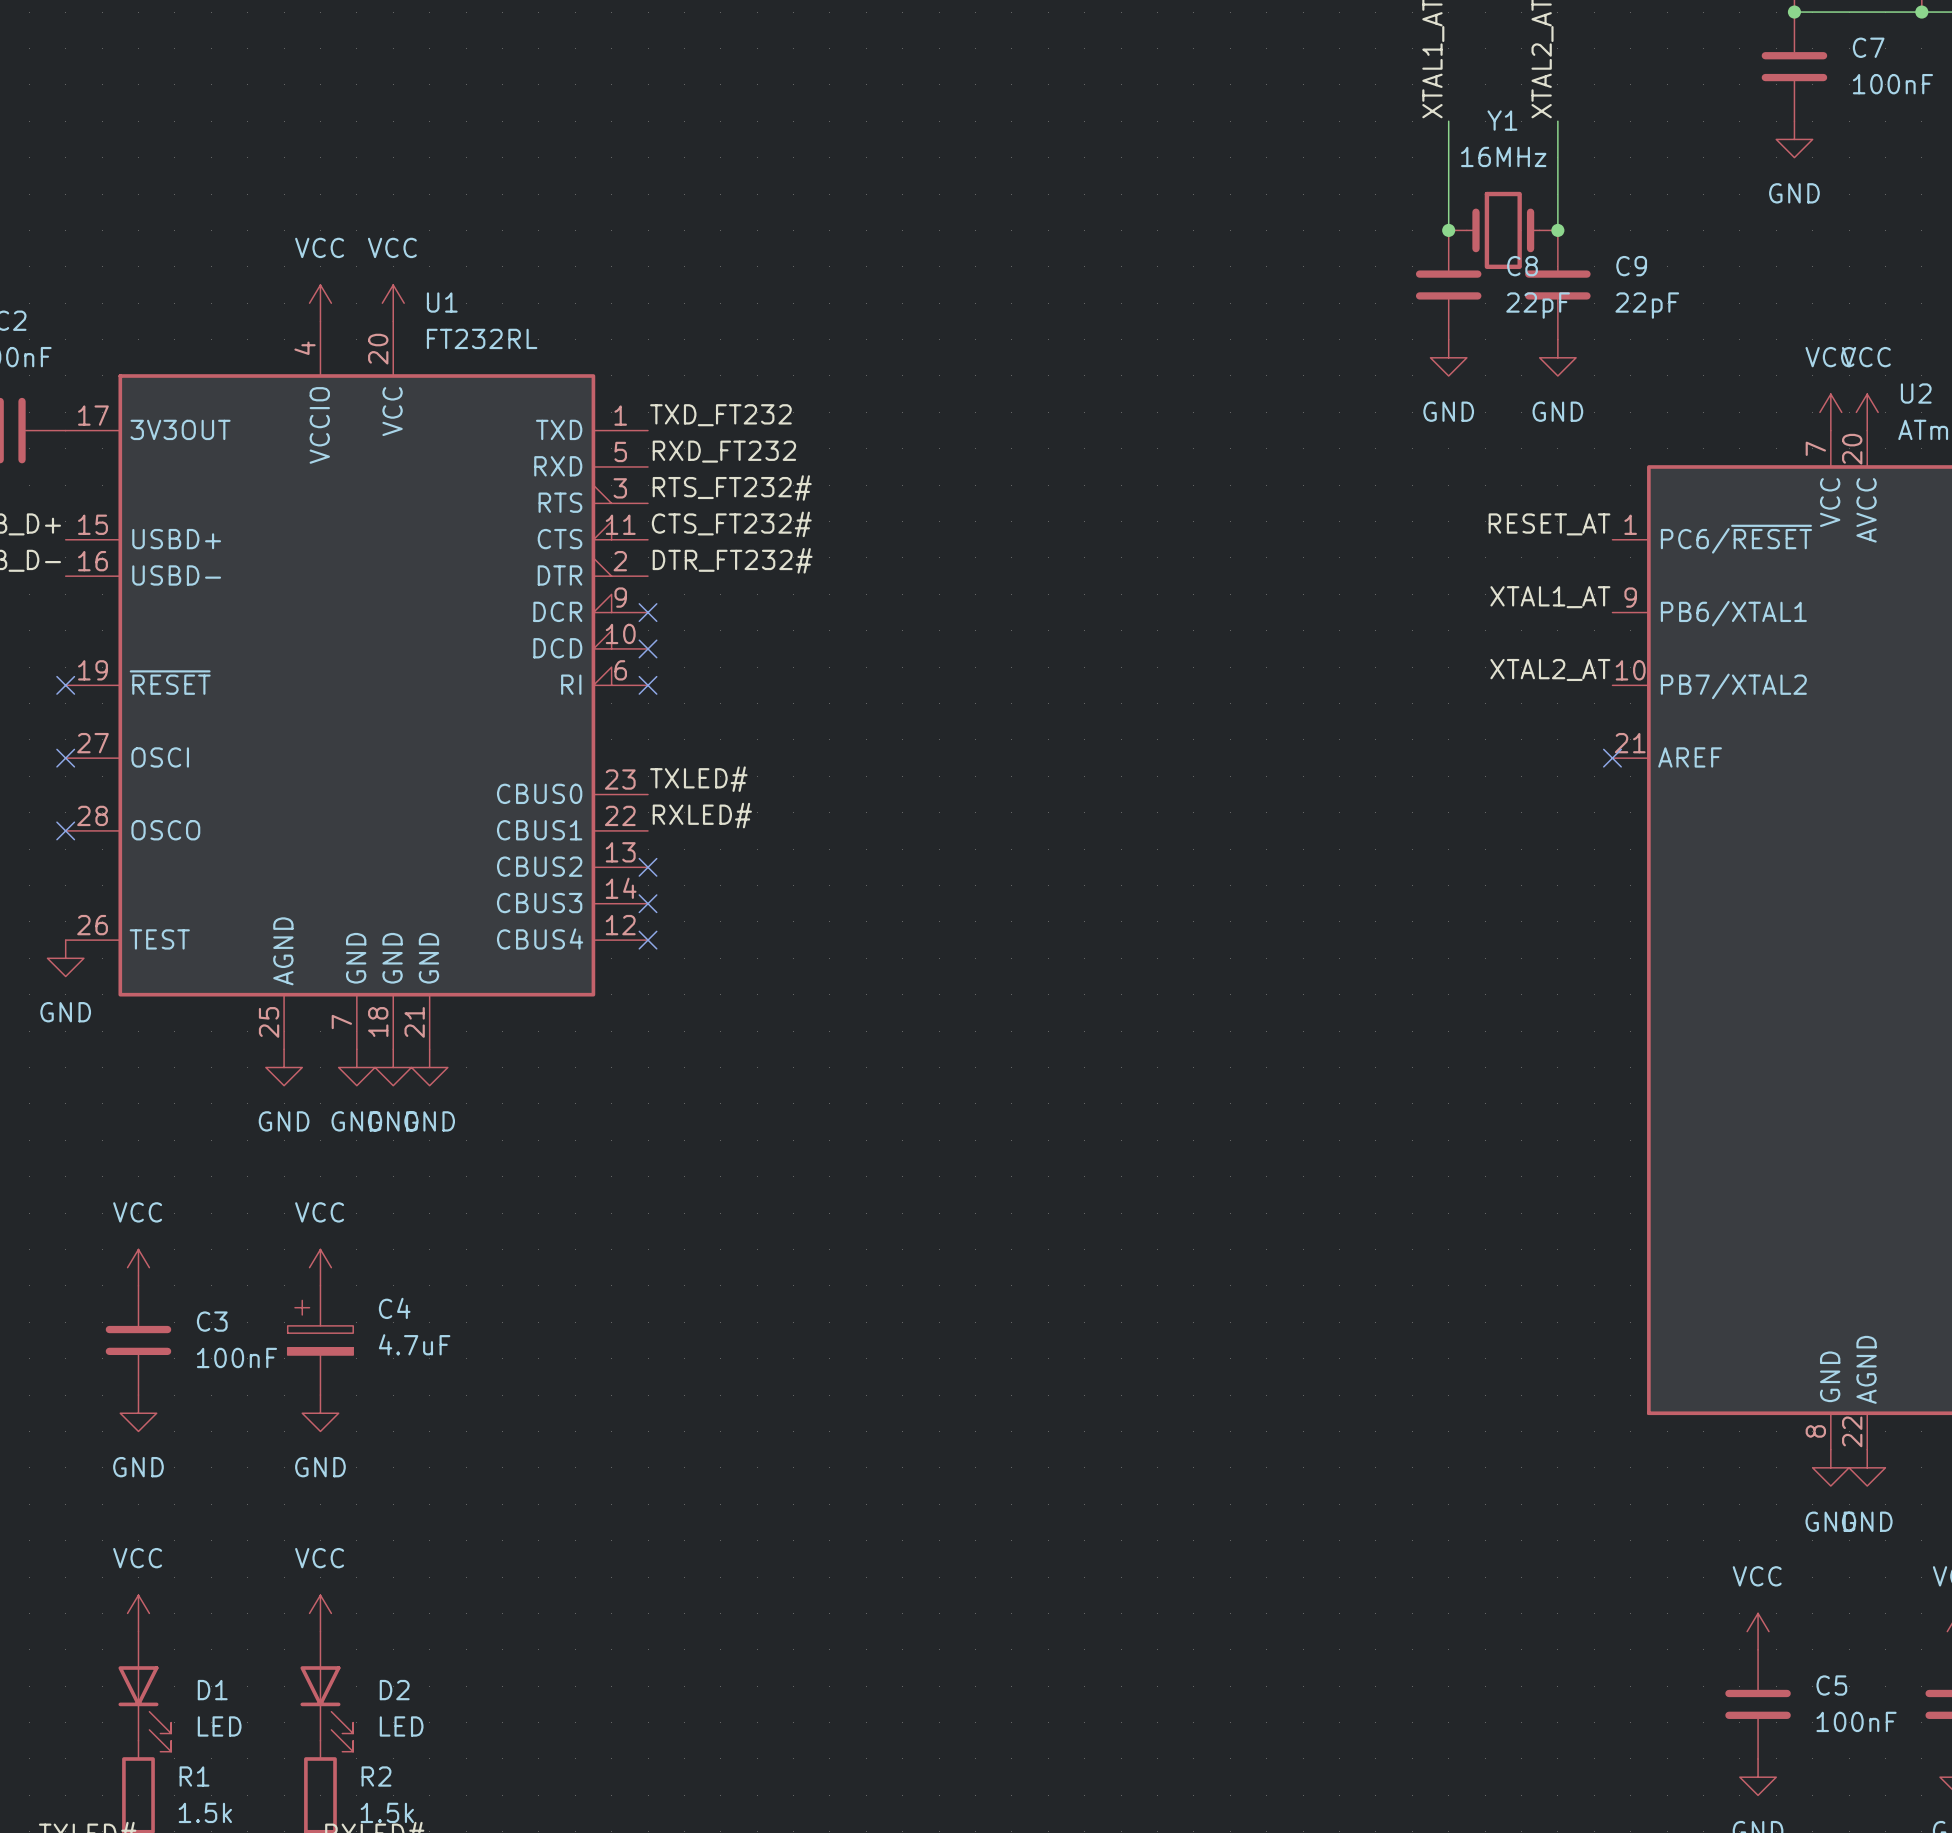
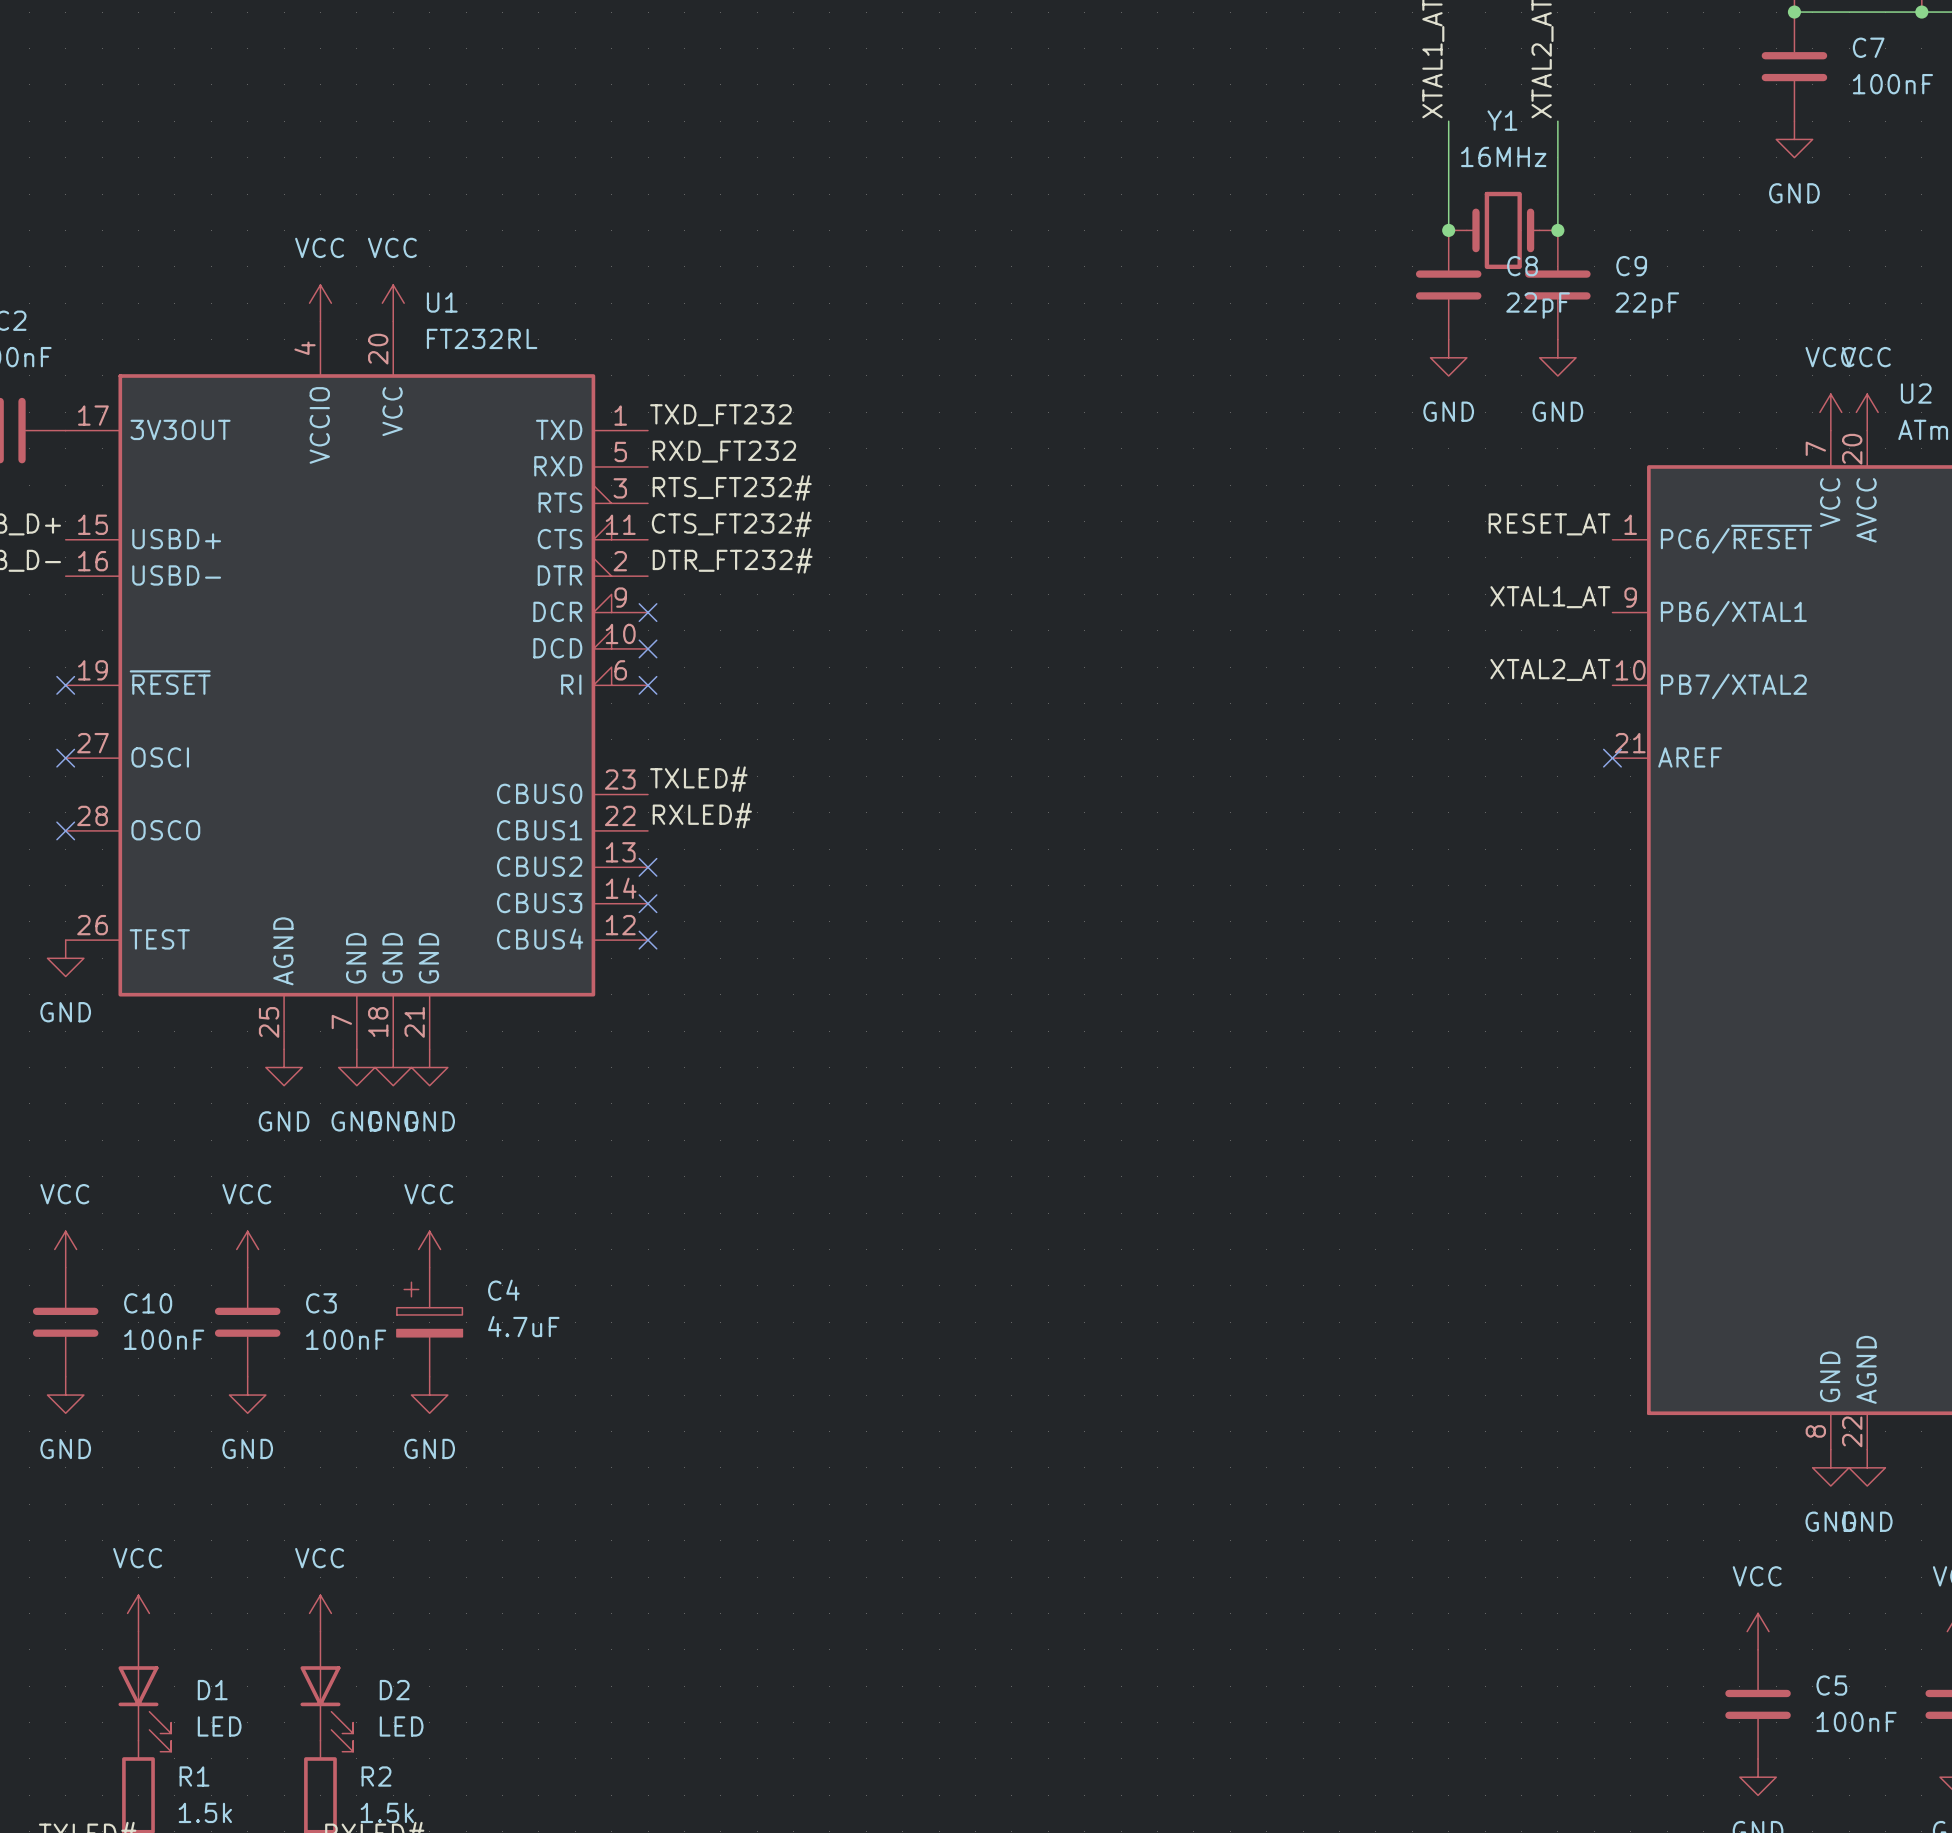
power symbol: none -> VCC (65, 1249)
power symbol: none -> VCC (247, 1249)
power symbol: none -> VCC (429, 1249)
power symbol: VCC (138, 1267) -> none
power symbol: VCC (320, 1267) -> none
C10: none -> 100nF (65, 1322)
C3 position: (138, 1340) -> (247, 1322)
C4 position: (320, 1340) -> (429, 1322)
power symbol: none -> GND (65, 1395)
power symbol: none -> GND (247, 1395)
power symbol: none -> GND (429, 1395)
power symbol: GND (138, 1413) -> none
power symbol: GND (320, 1413) -> none

